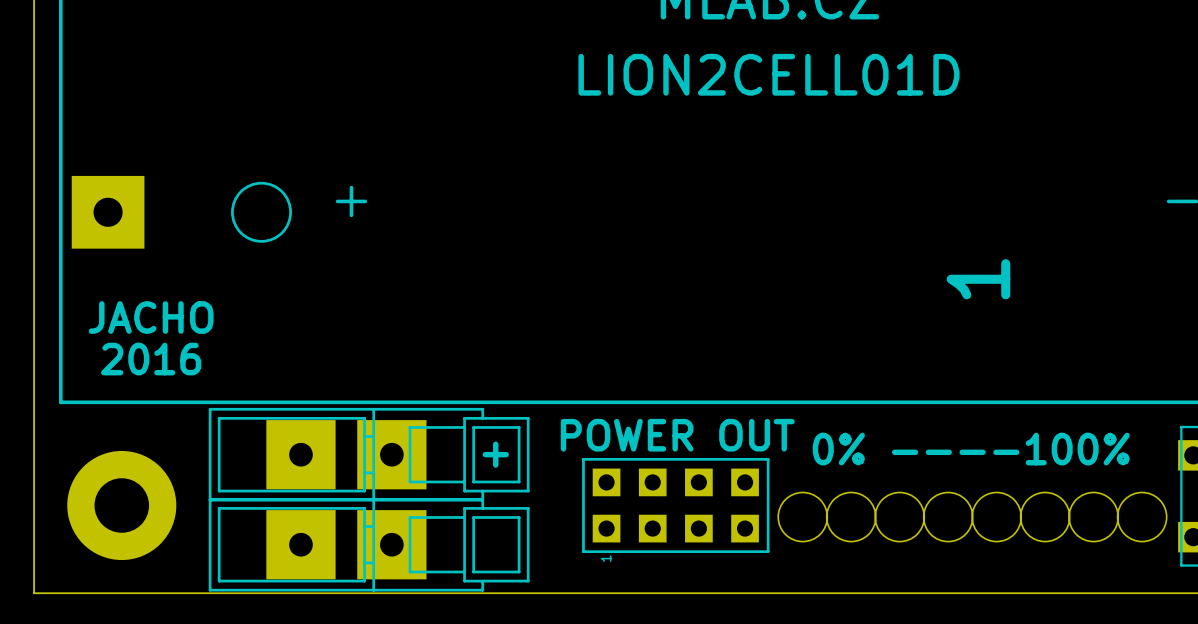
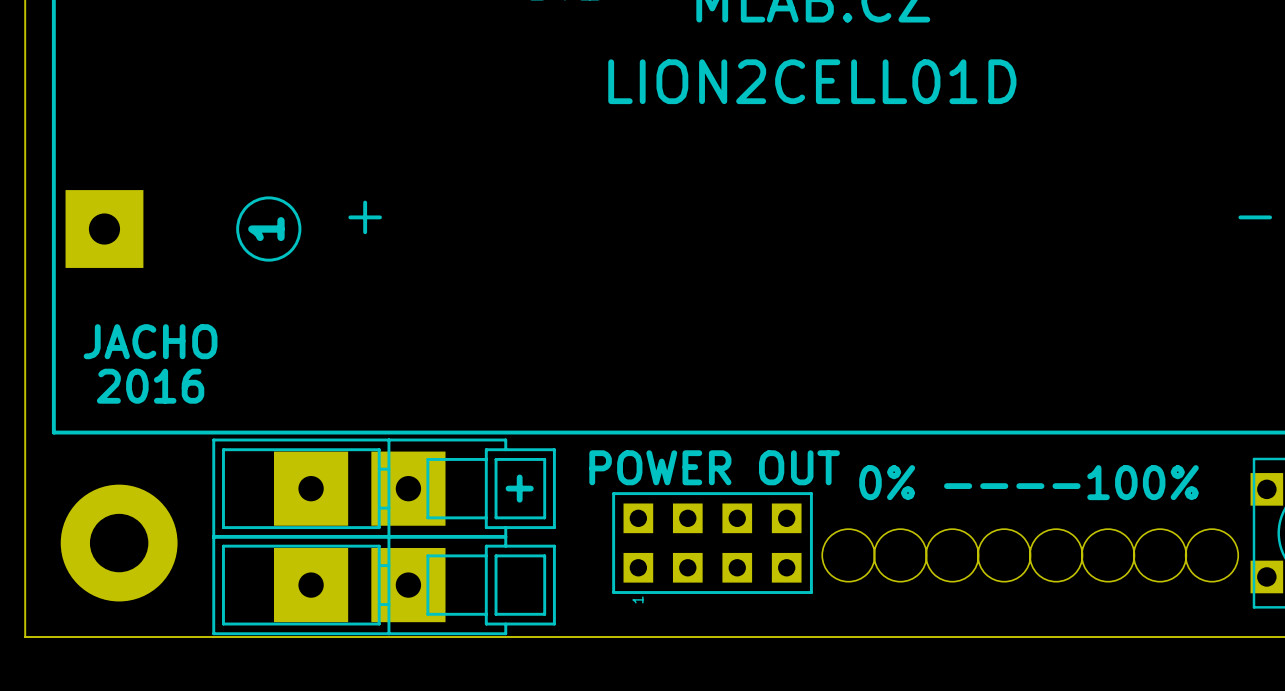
text: none -> 1 (266, 229)
text: 1 (978, 279) -> none

